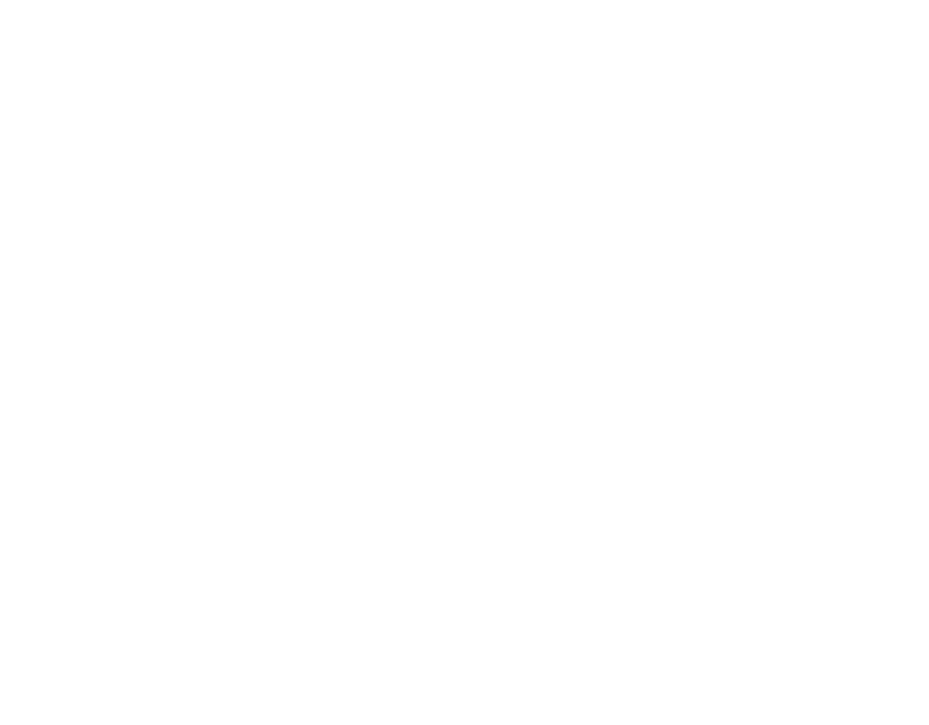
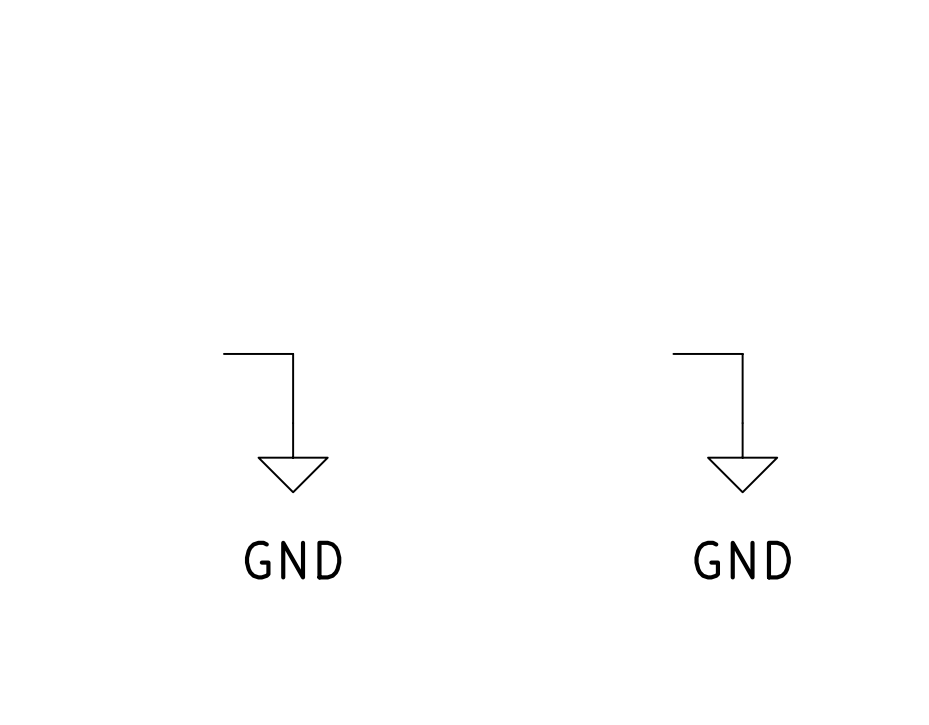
wire: none -> (223, 353) (293, 353) (293, 423)
wire: none -> (673, 353) (742, 353) (742, 423)
power symbol: none -> GND (293, 457)
power symbol: none -> GND (742, 457)

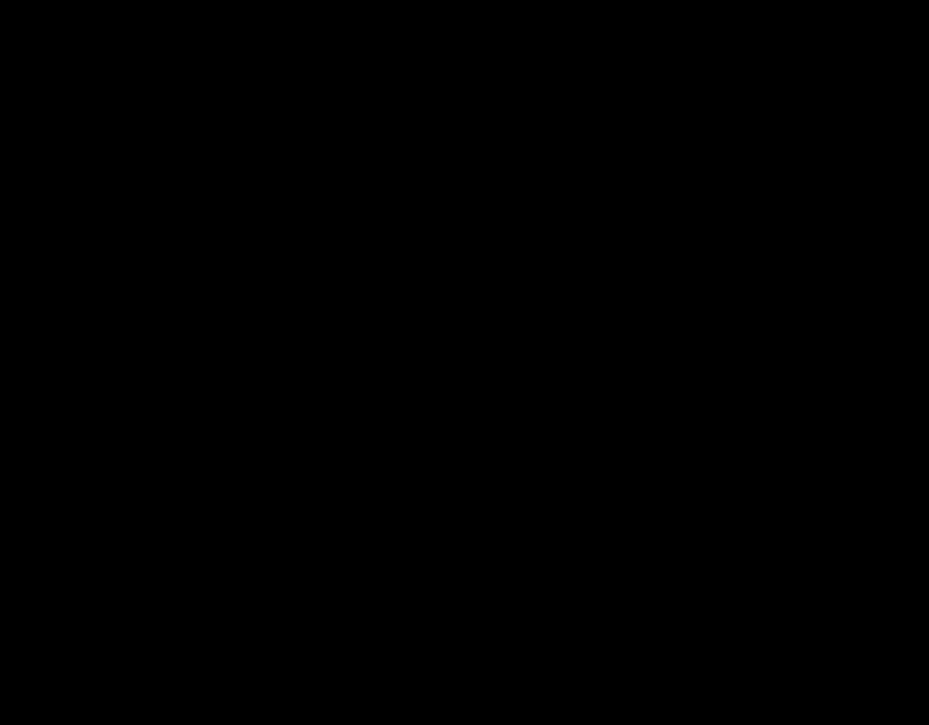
wire: (223, 353) (293, 353) (293, 423) -> none
wire: (673, 353) (742, 353) (742, 423) -> none
power symbol: GND (293, 457) -> none
power symbol: GND (742, 457) -> none

